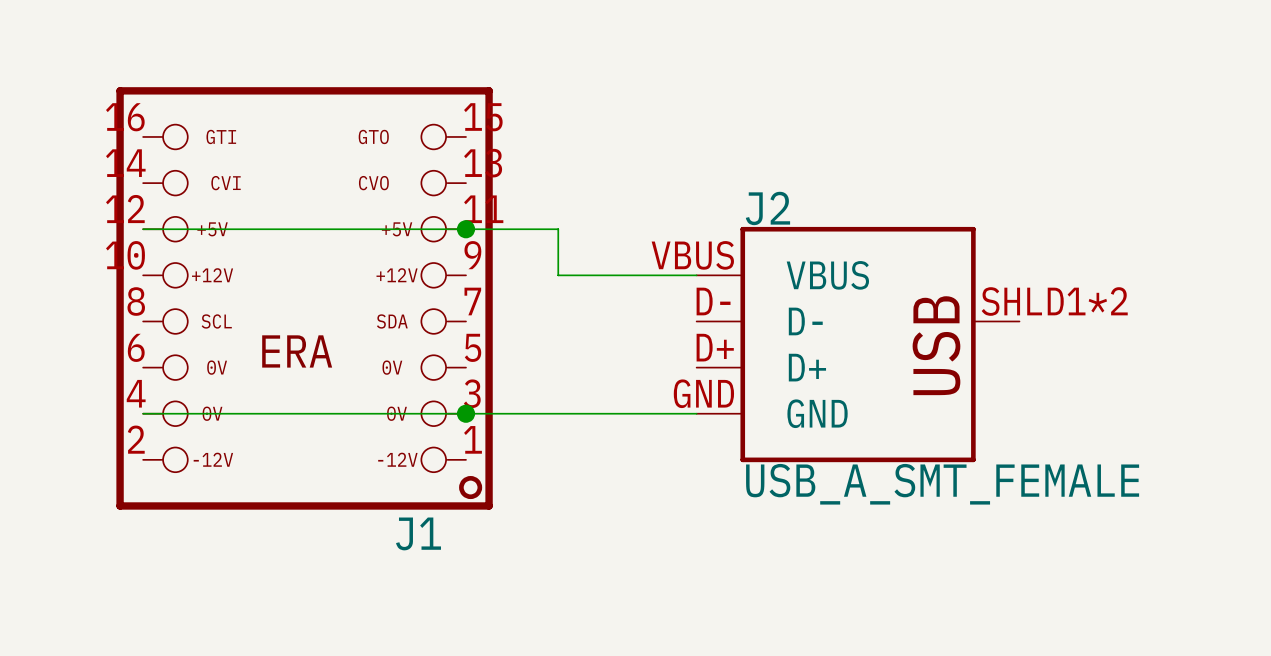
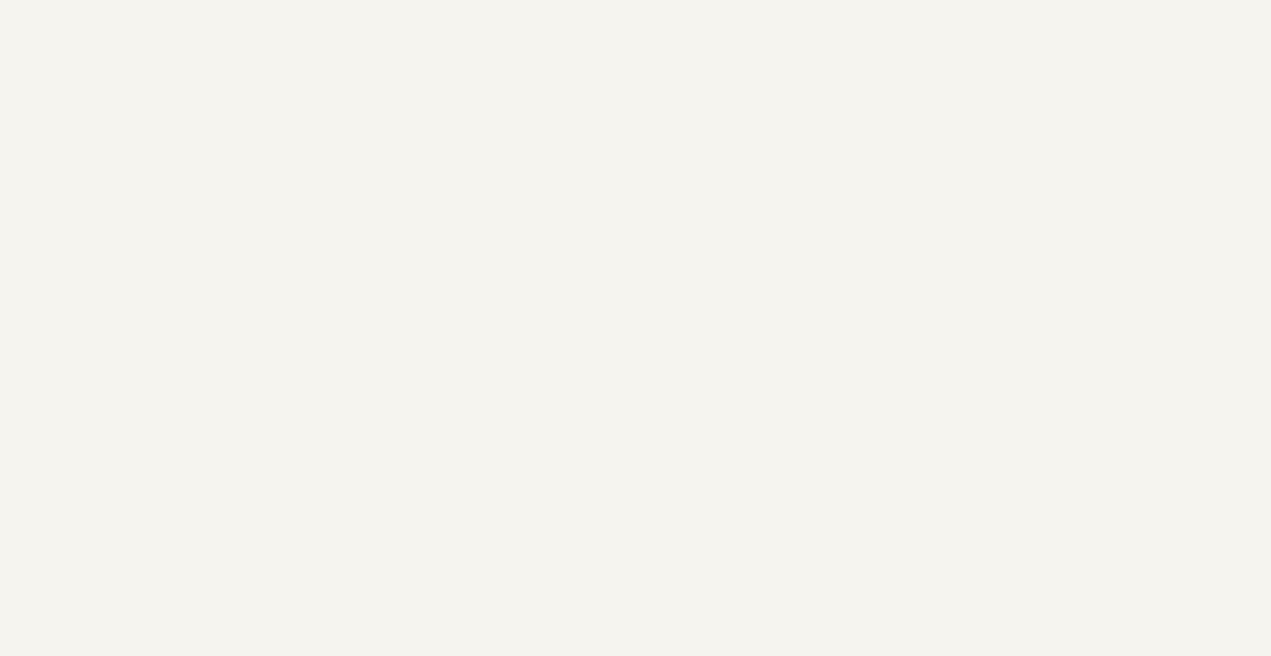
wire: (143, 229) (558, 229) (558, 275) (696, 275) -> none
junction: (466, 229) -> none
J1: (304, 298) -> none
J2: USB_A_SMT_FEMALE (858, 344) -> none
wire: (143, 413) (696, 413) -> none
junction: (466, 413) -> none

